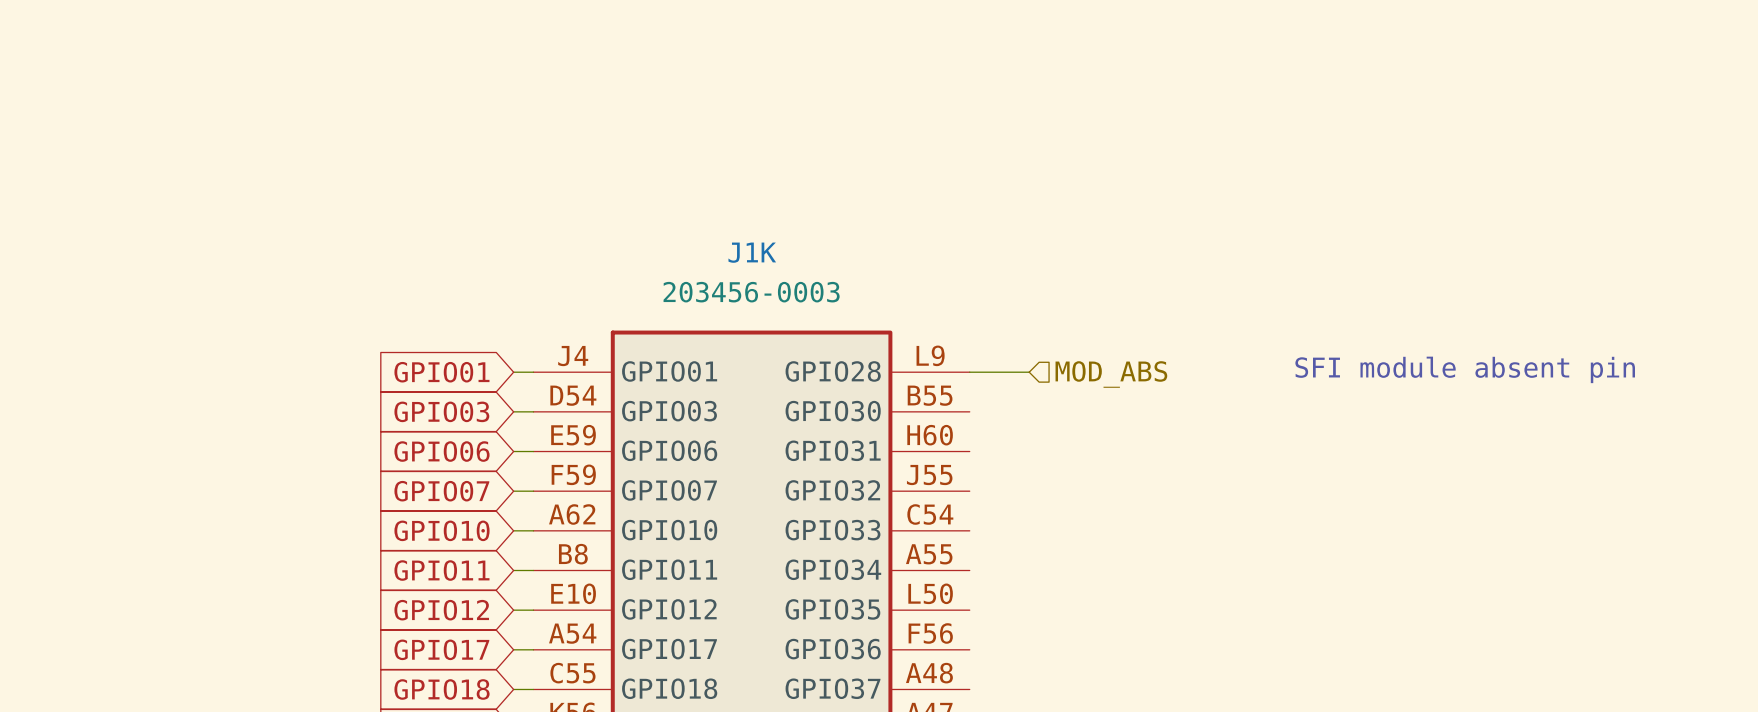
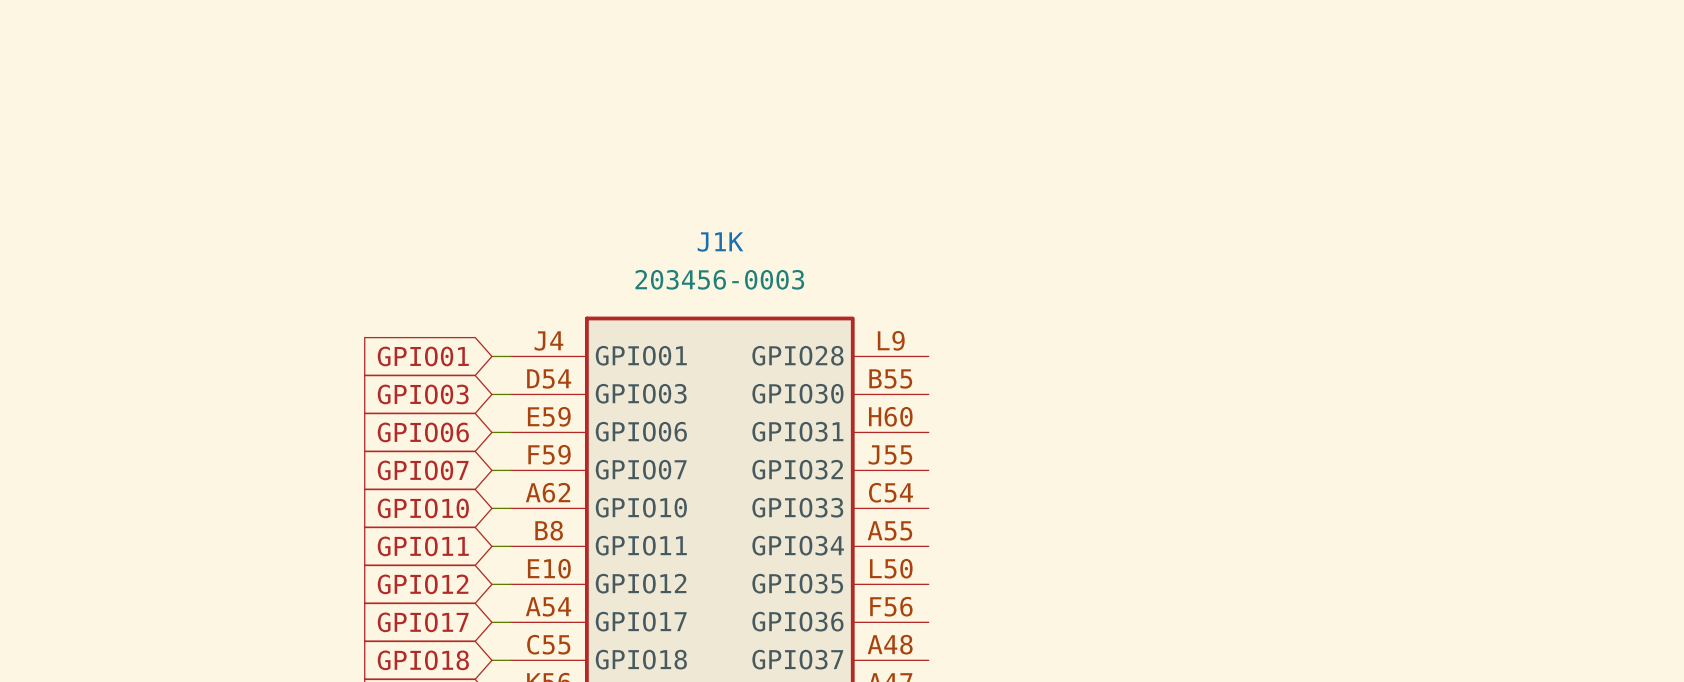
text: SFI module absent pin (1465, 369) -> none
wire: (969, 372) (1029, 372) -> none
hierarchical label: MOD_ABS (1111, 374) -> none

